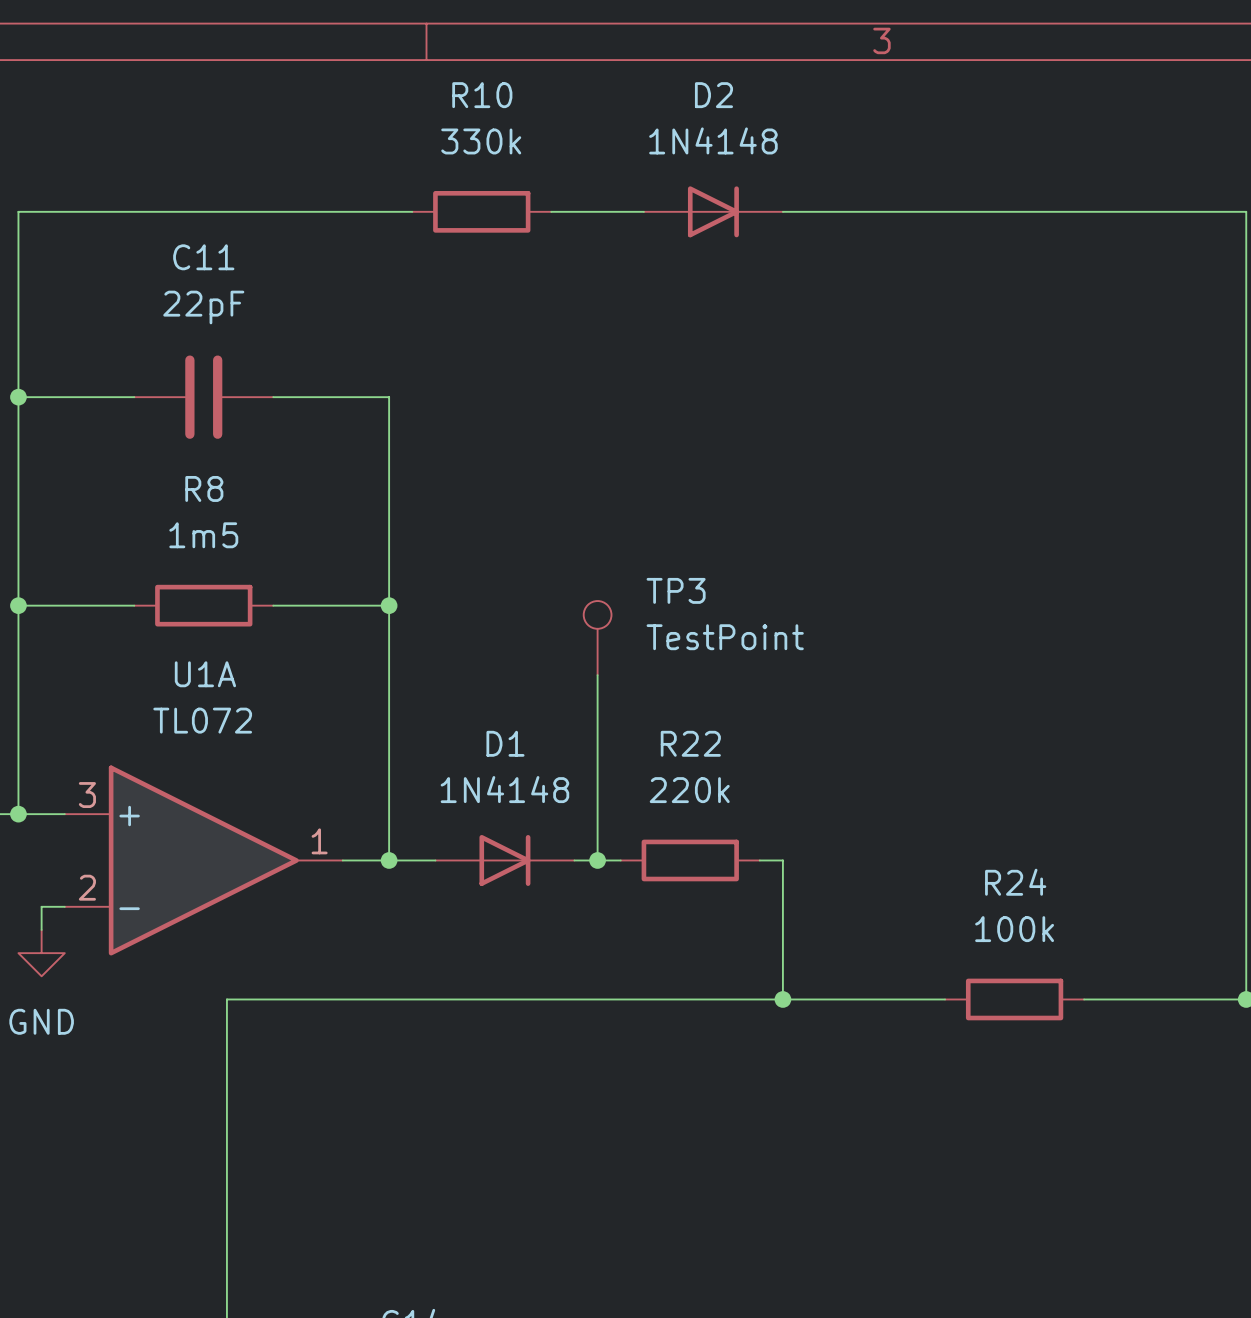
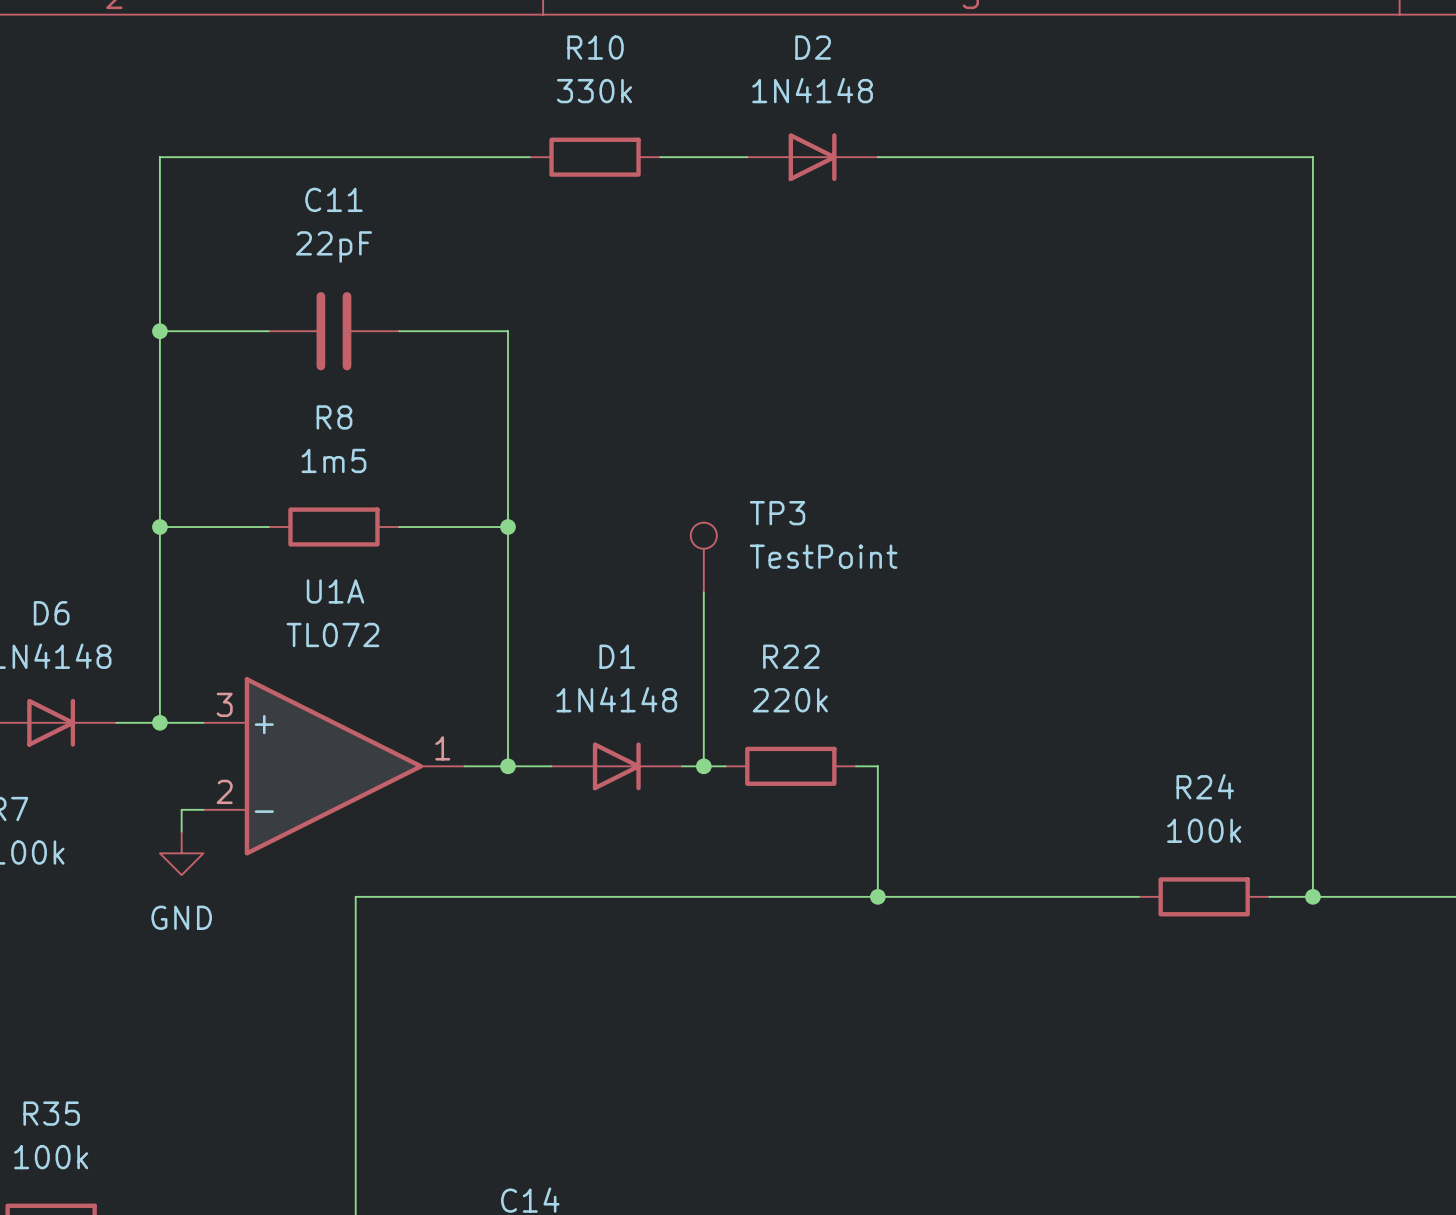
R24 position: (1014, 999) -> (1204, 896)
wire: (1084, 999) (1199, 999) -> (1030, 896) (1138, 896)

